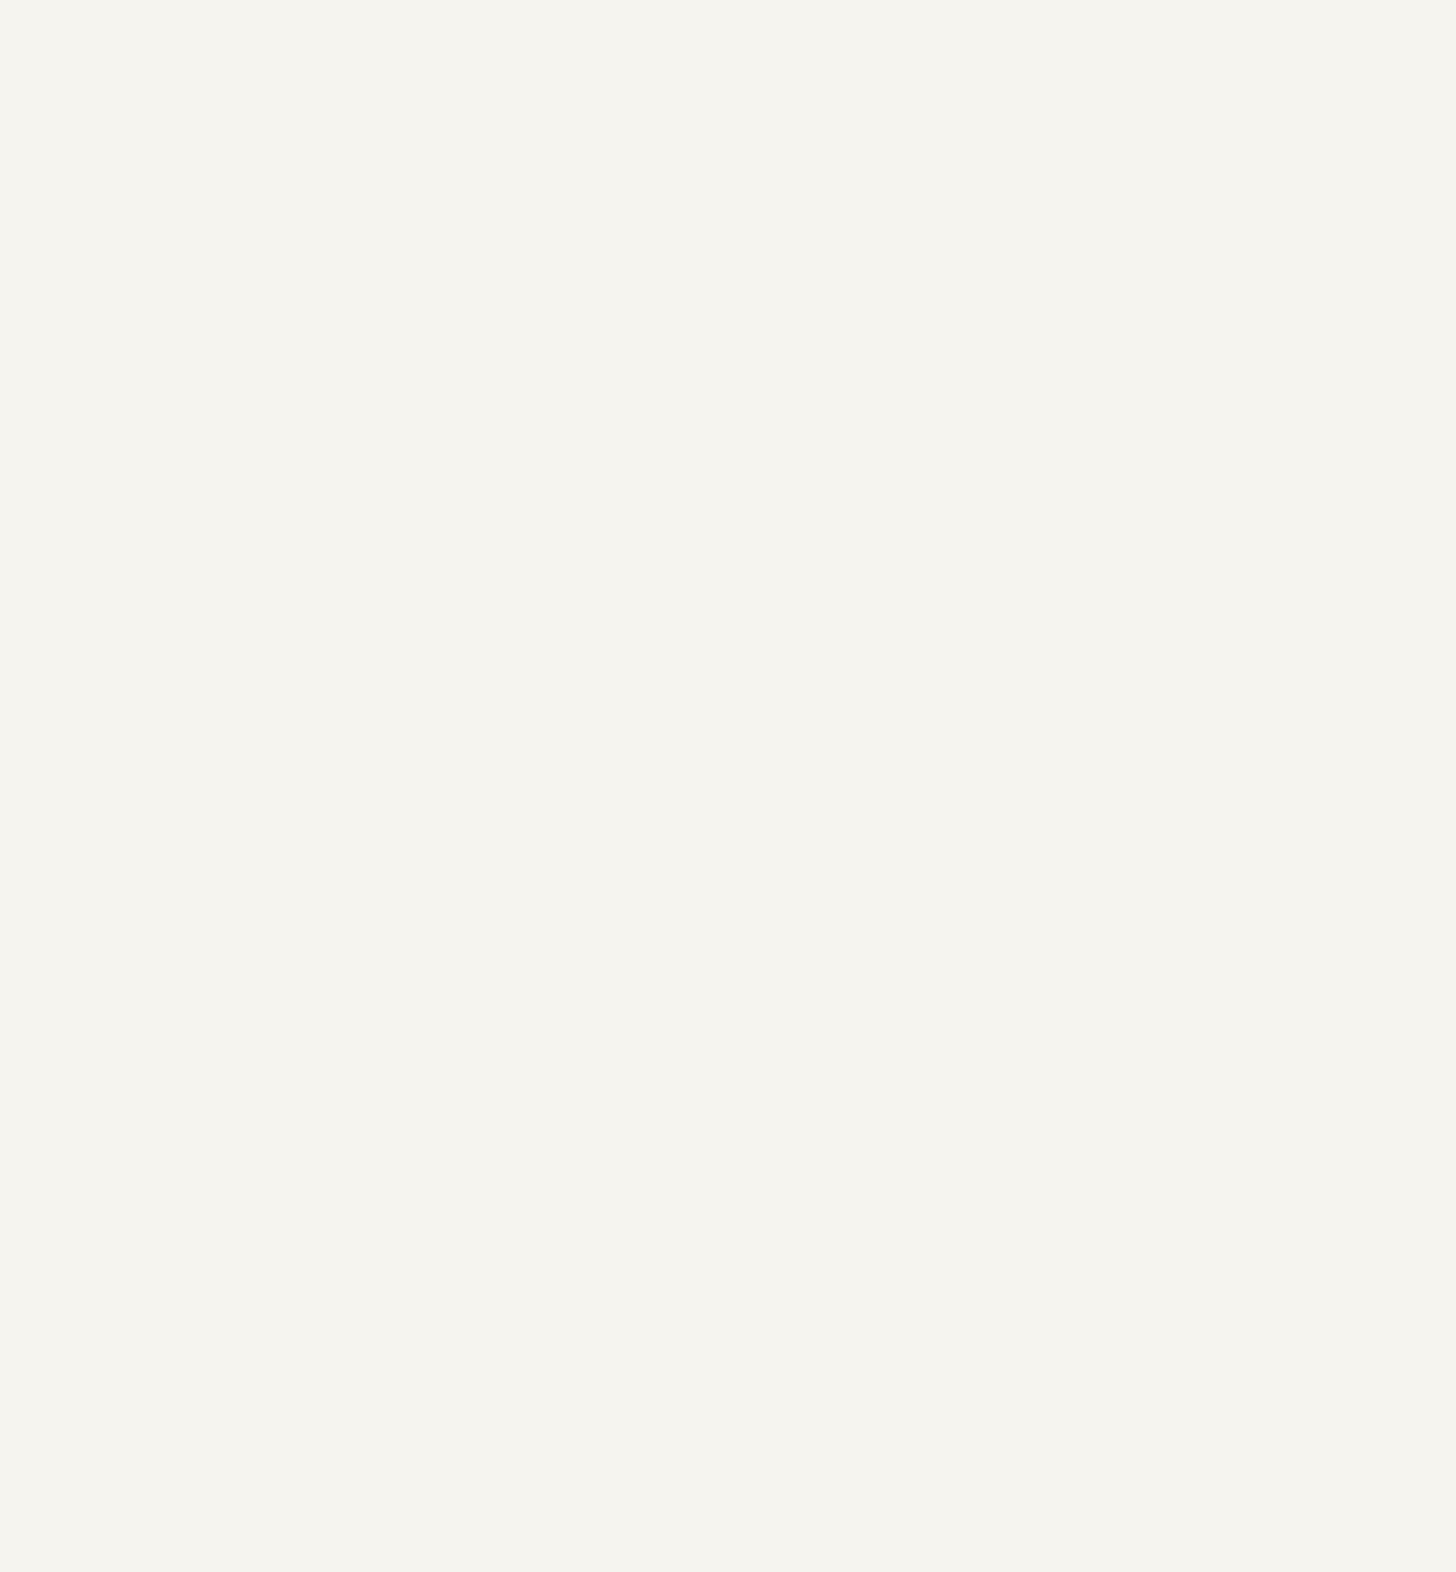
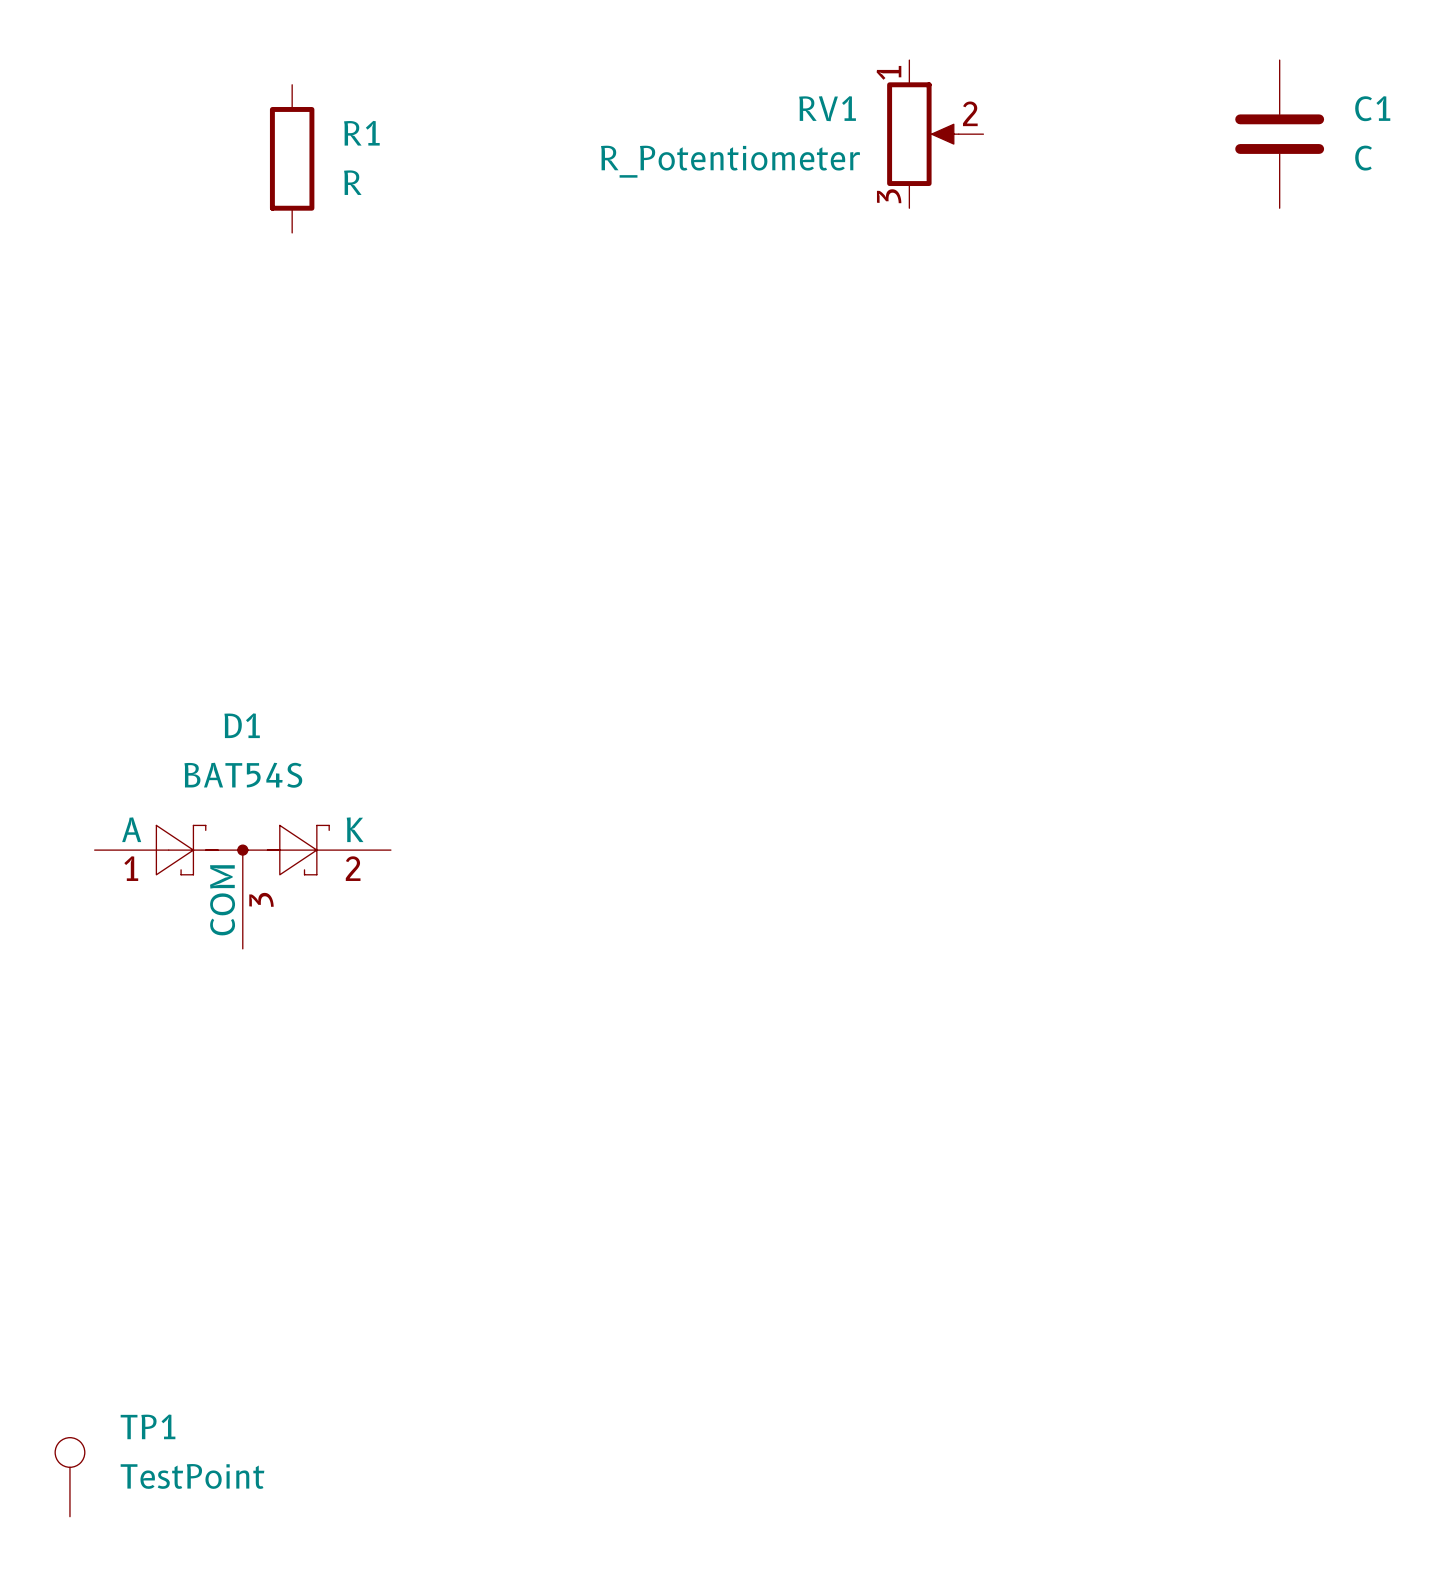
RV1: none -> R_Potentiometer (935, 134)
C1: none -> C (1279, 134)
R1: none -> R (292, 158)
D1: none -> BAT54S (242, 887)
TP1: none -> TestPoint (69, 1477)

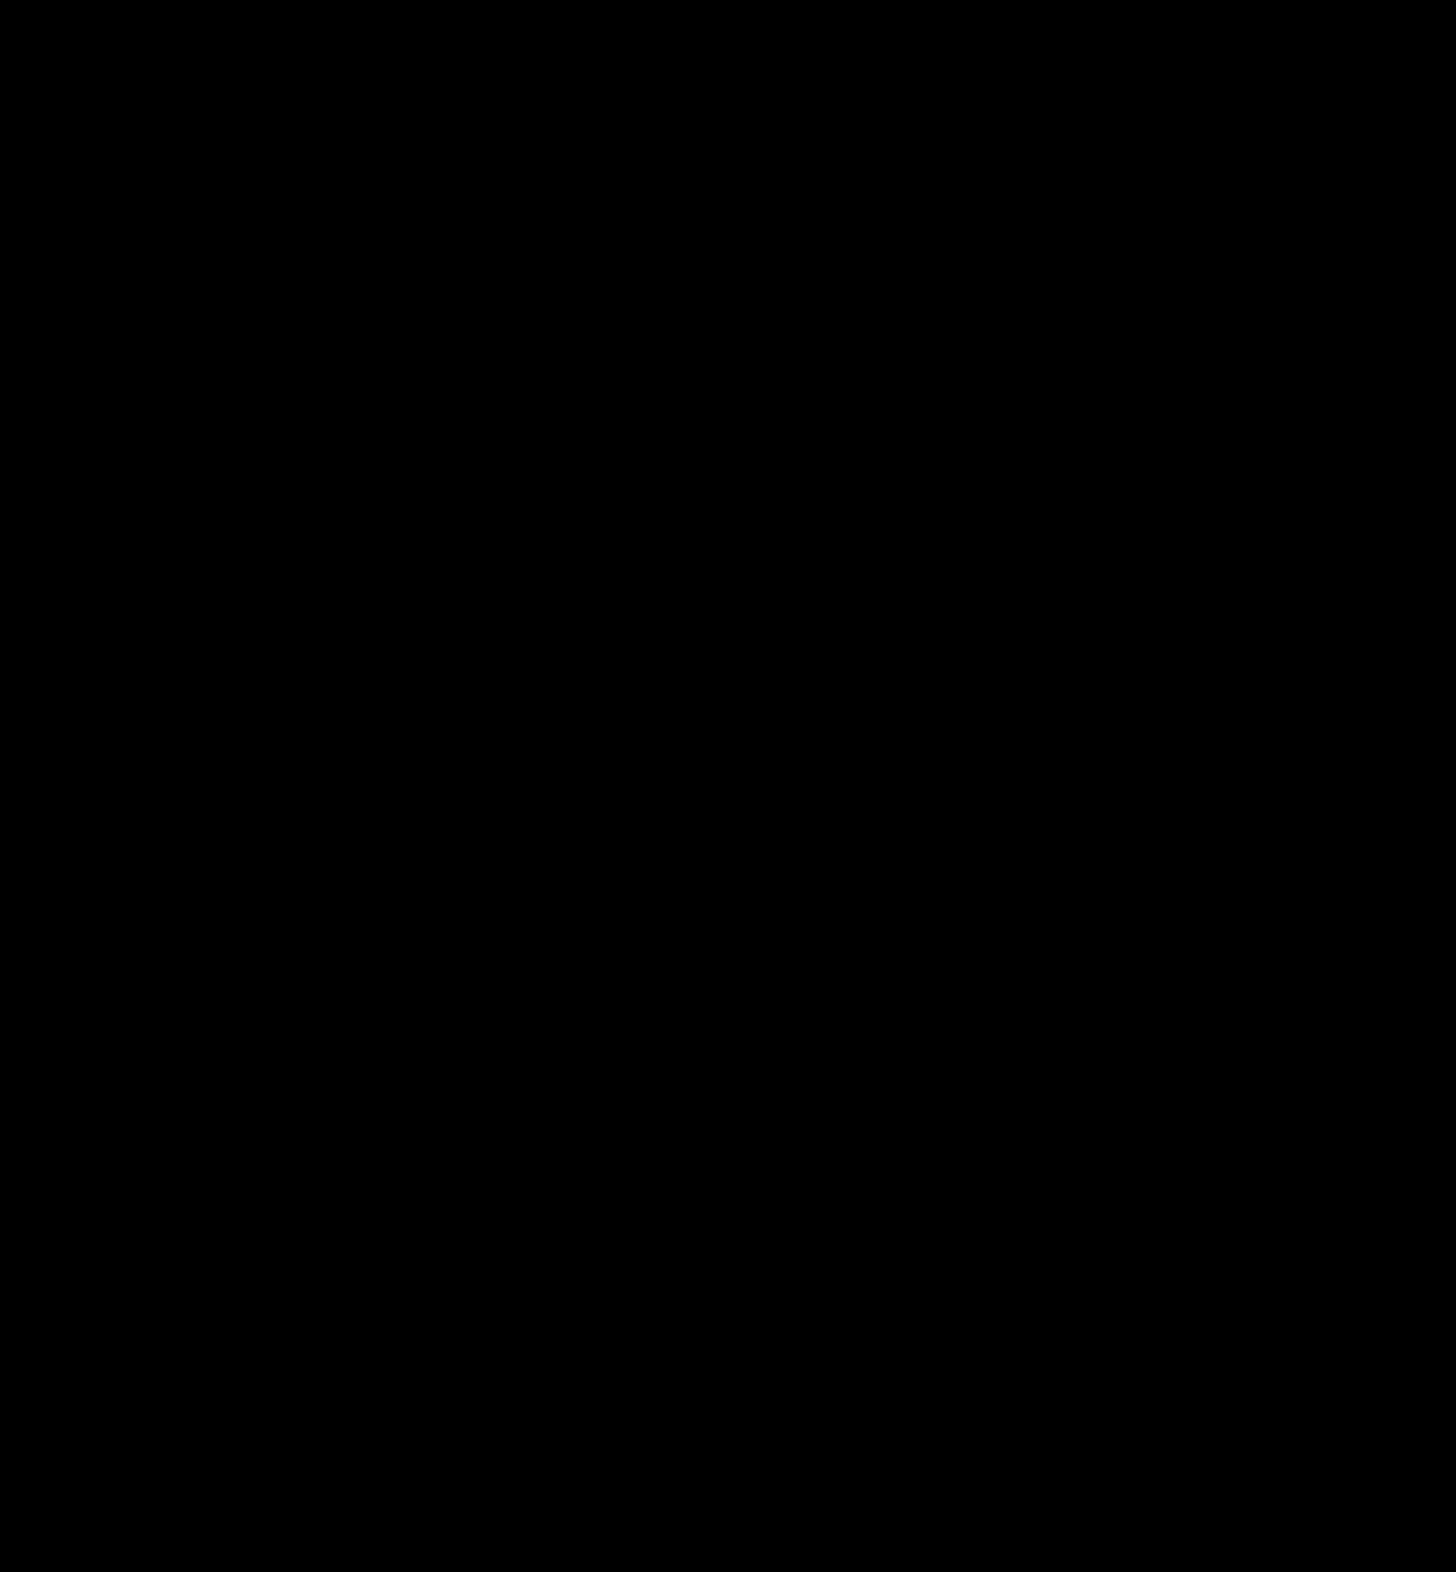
RV1: R_Potentiometer (935, 134) -> none
C1: C (1279, 134) -> none
R1: R (292, 158) -> none
D1: BAT54S (242, 887) -> none
TP1: TestPoint (69, 1477) -> none

